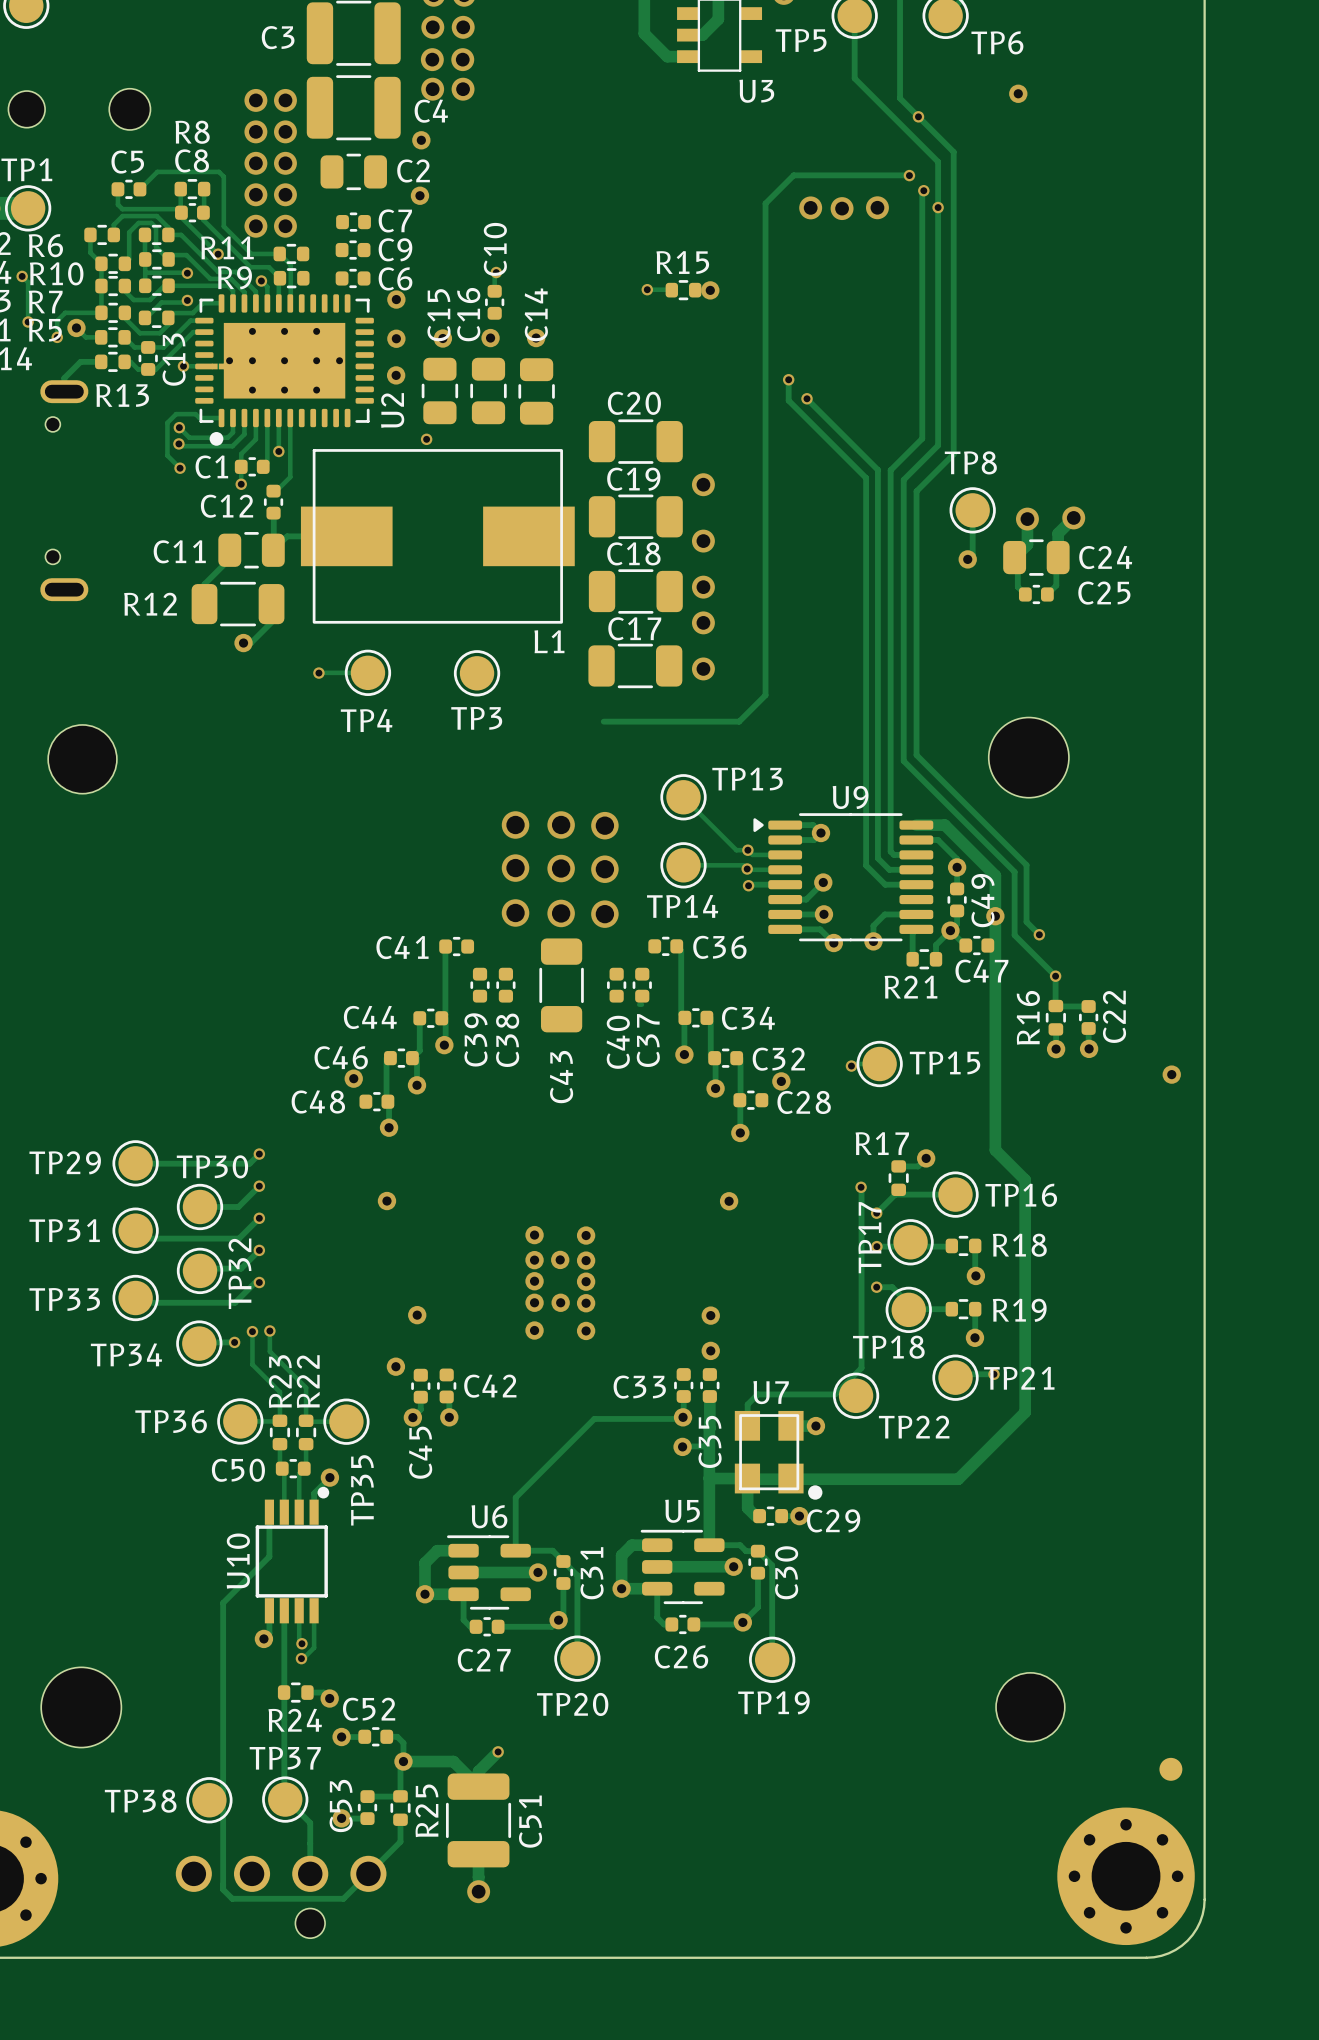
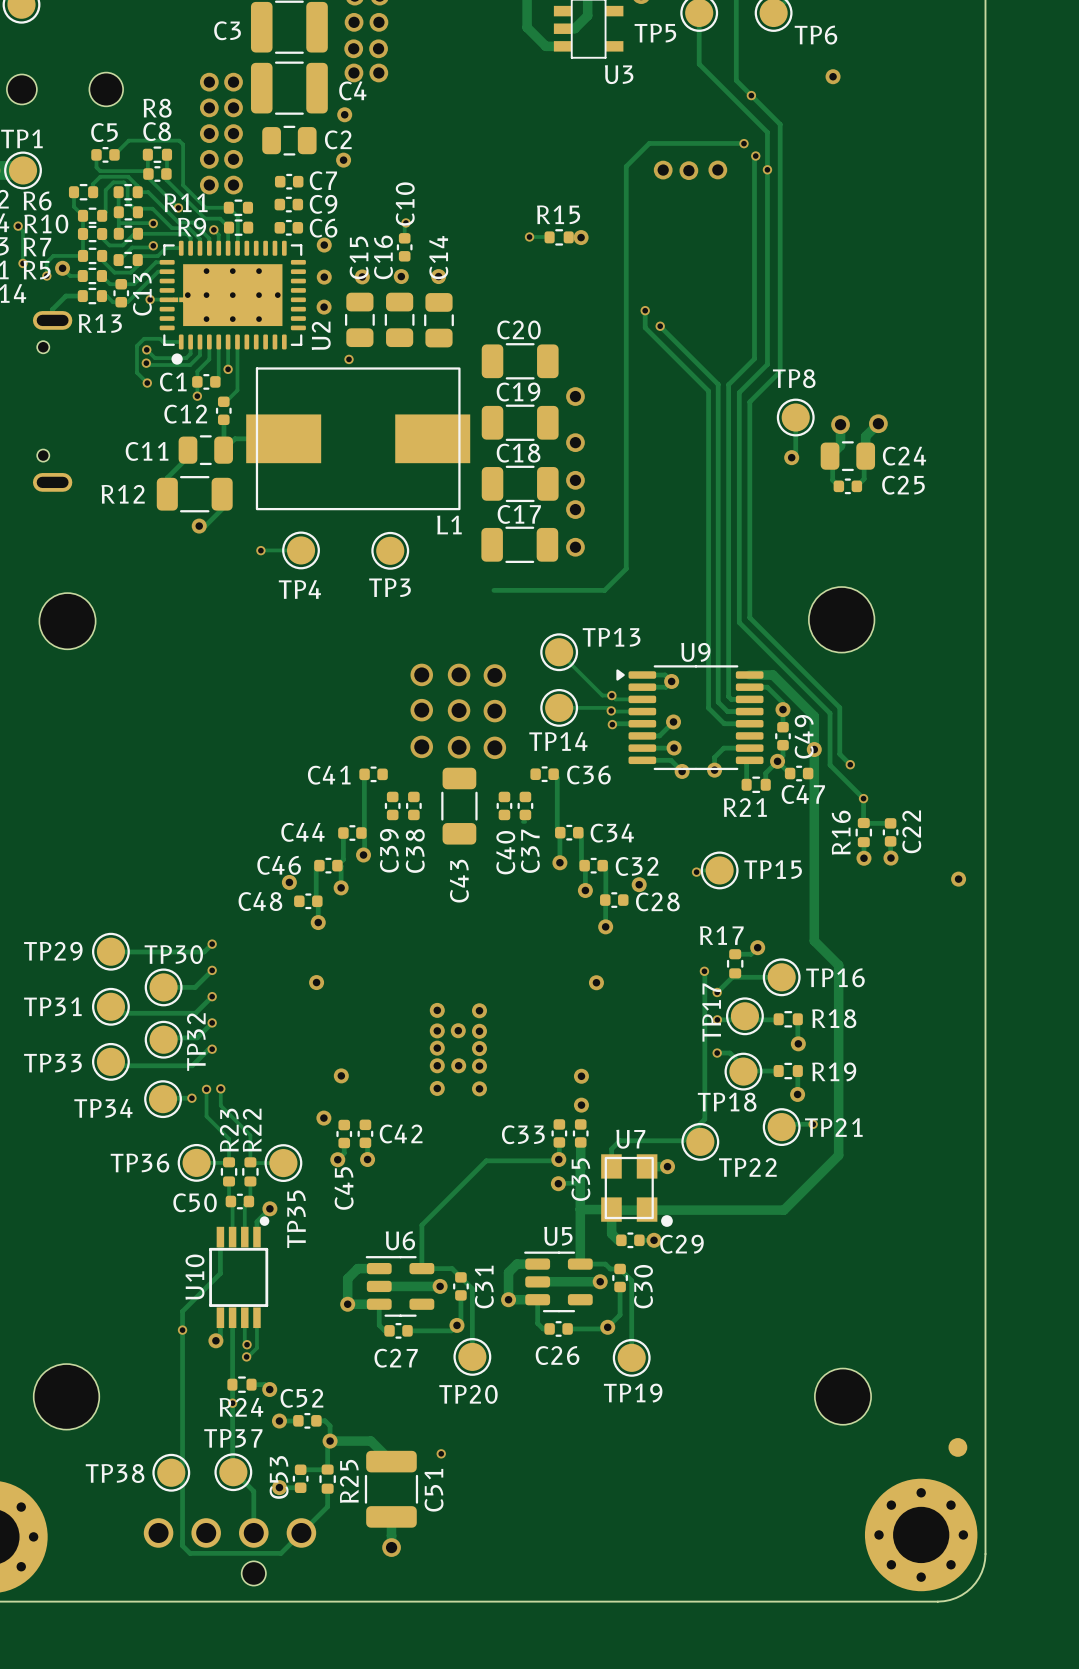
via: none -> (182, 1330)
via: none -> (232, 1403)
track: (498, 1751) (478, 1771) (478, 1786) -> none
via position: (498, 1751) -> (441, 1453)

